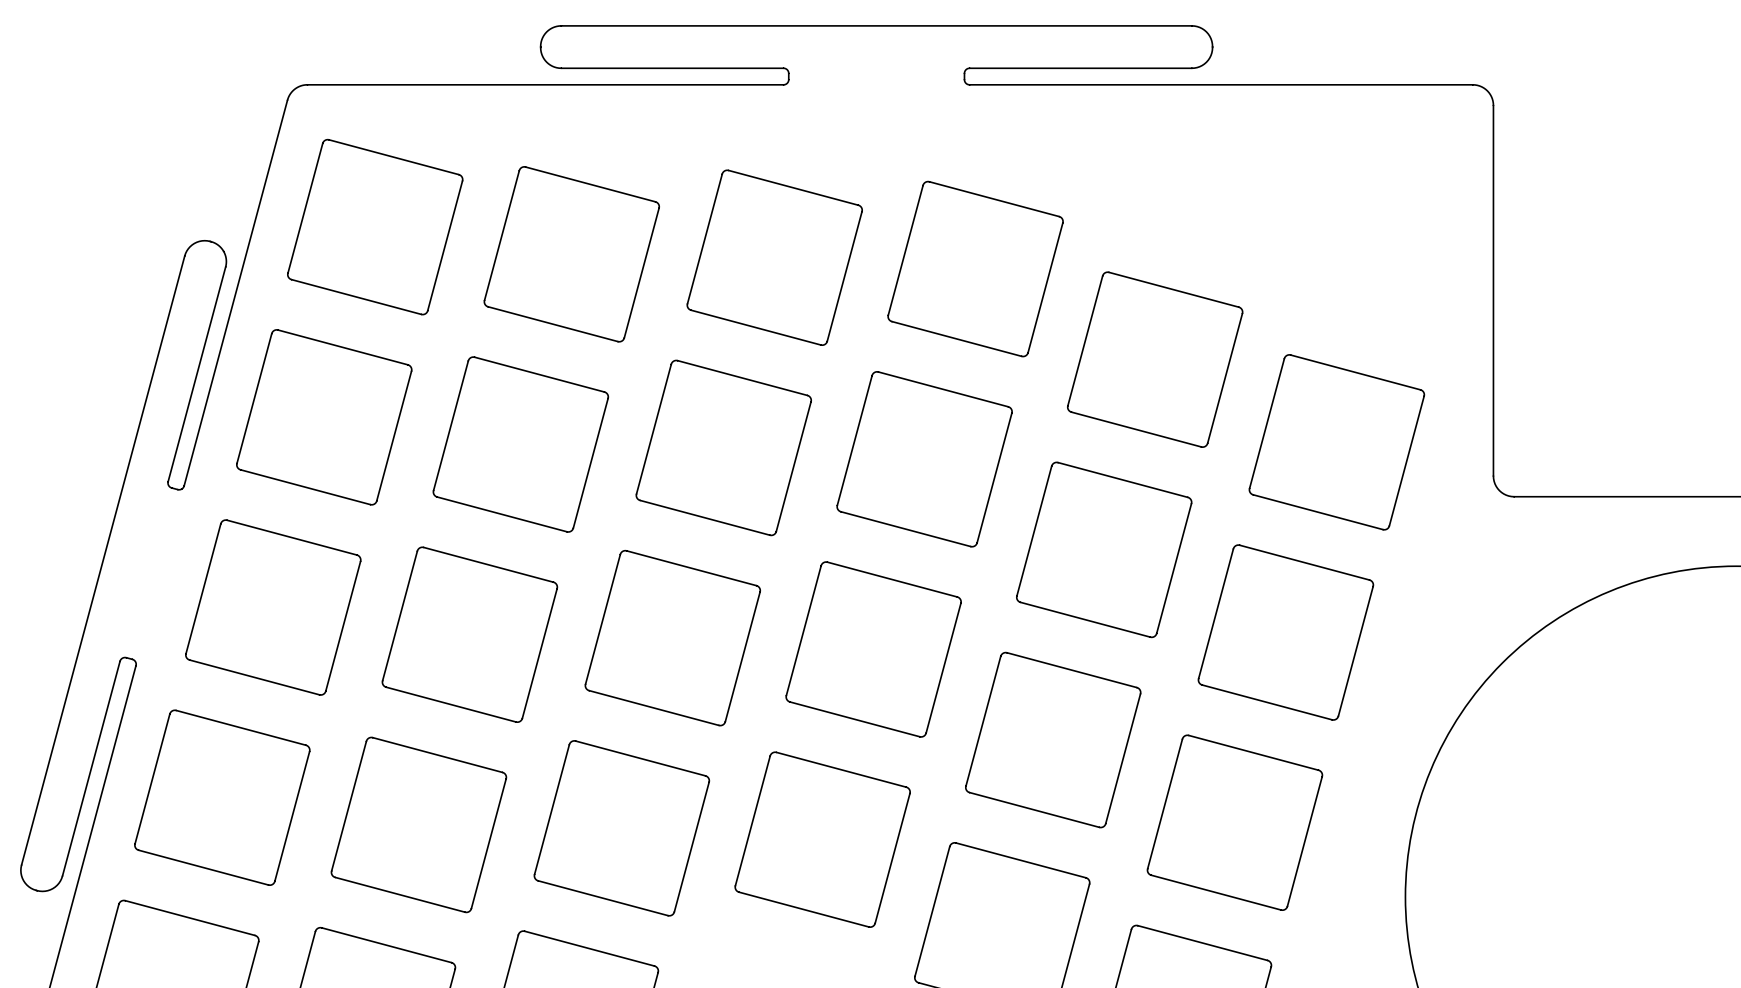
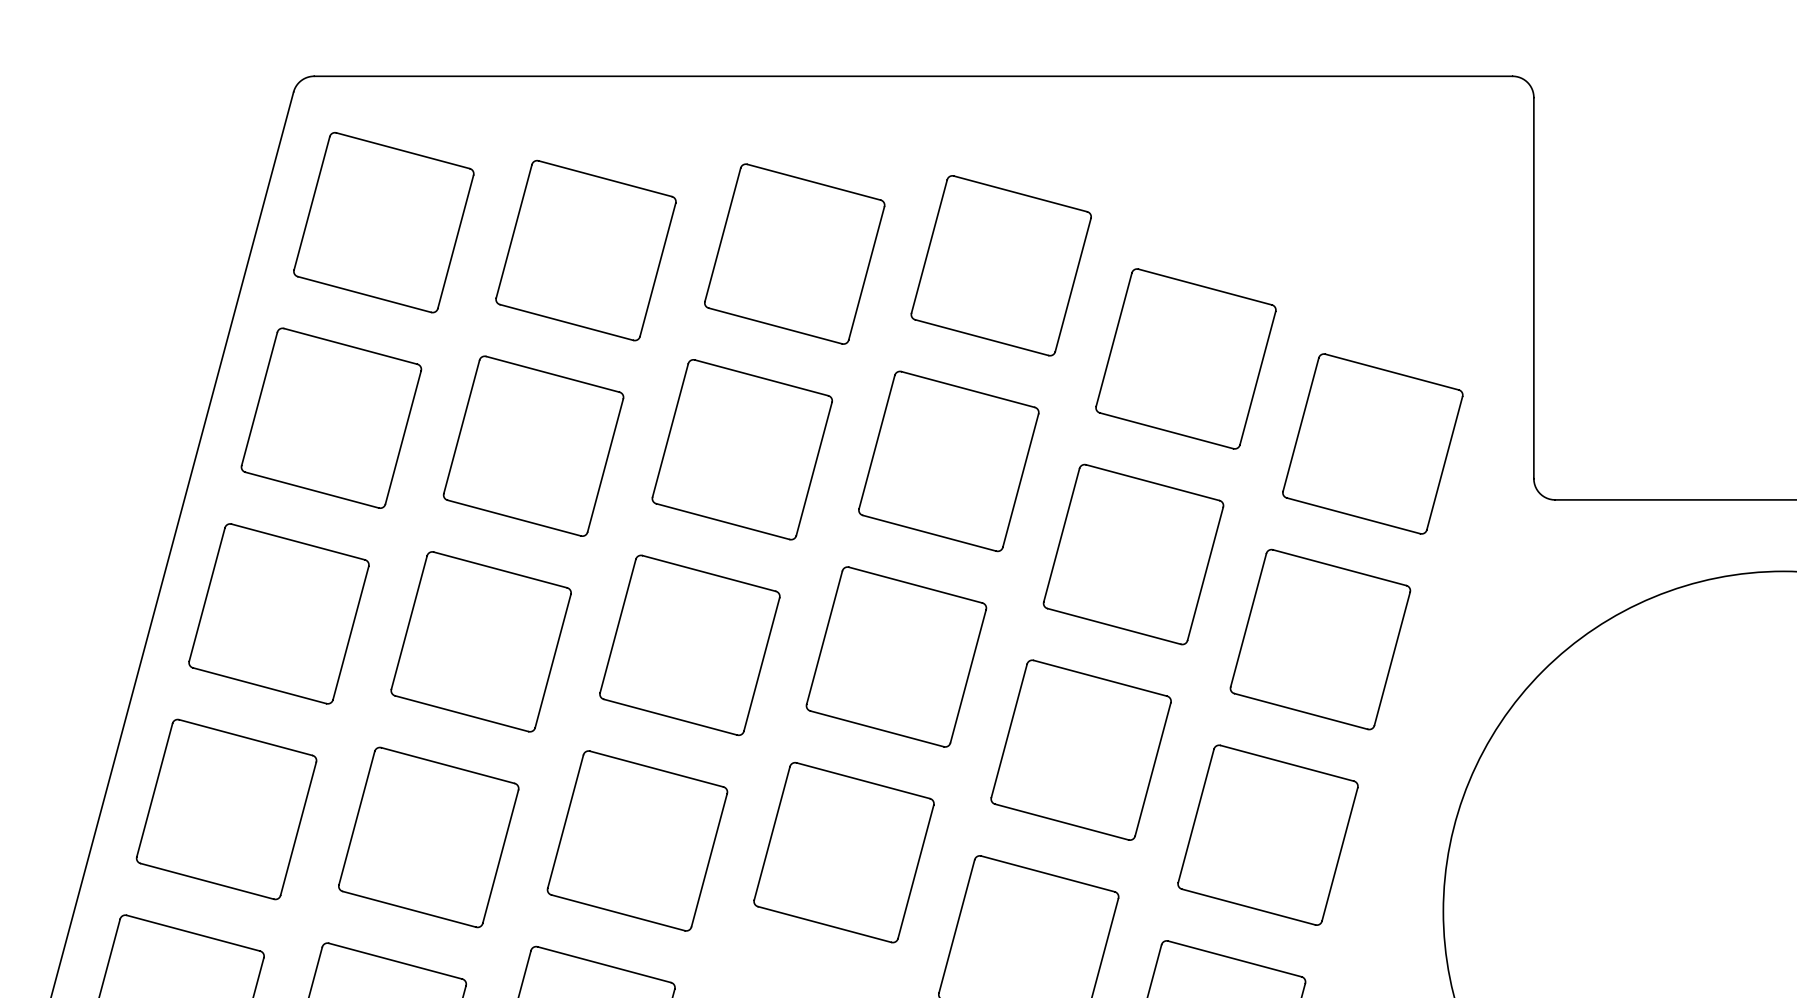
board edge: (783, 84) (787, 83) (788, 79) (788, 71) (784, 68) (556, 67) (548, 63) (543, 58) (540, 49) (541, 41) (548, 30) (561, 25) (1191, 25) (1204, 30) (1209, 36) (1212, 43) (1211, 52) (1208, 60) (1202, 65) (1194, 68) (969, 68) (964, 71) (964, 79) (965, 83) (969, 84) -> (803, 76) (995, 76)
board edge: (184, 485) (178, 489) (170, 487) (168, 482) (226, 263) (225, 255) (221, 248) (215, 243) (207, 240) (194, 243) (188, 248) (184, 256) (21, 865) (21, 873) (23, 880) (33, 889) (42, 891) (50, 889) (57, 885) (61, 878) (120, 660) (124, 657) (132, 659) (135, 661) (136, 665) -> (187, 488) (137, 673)

